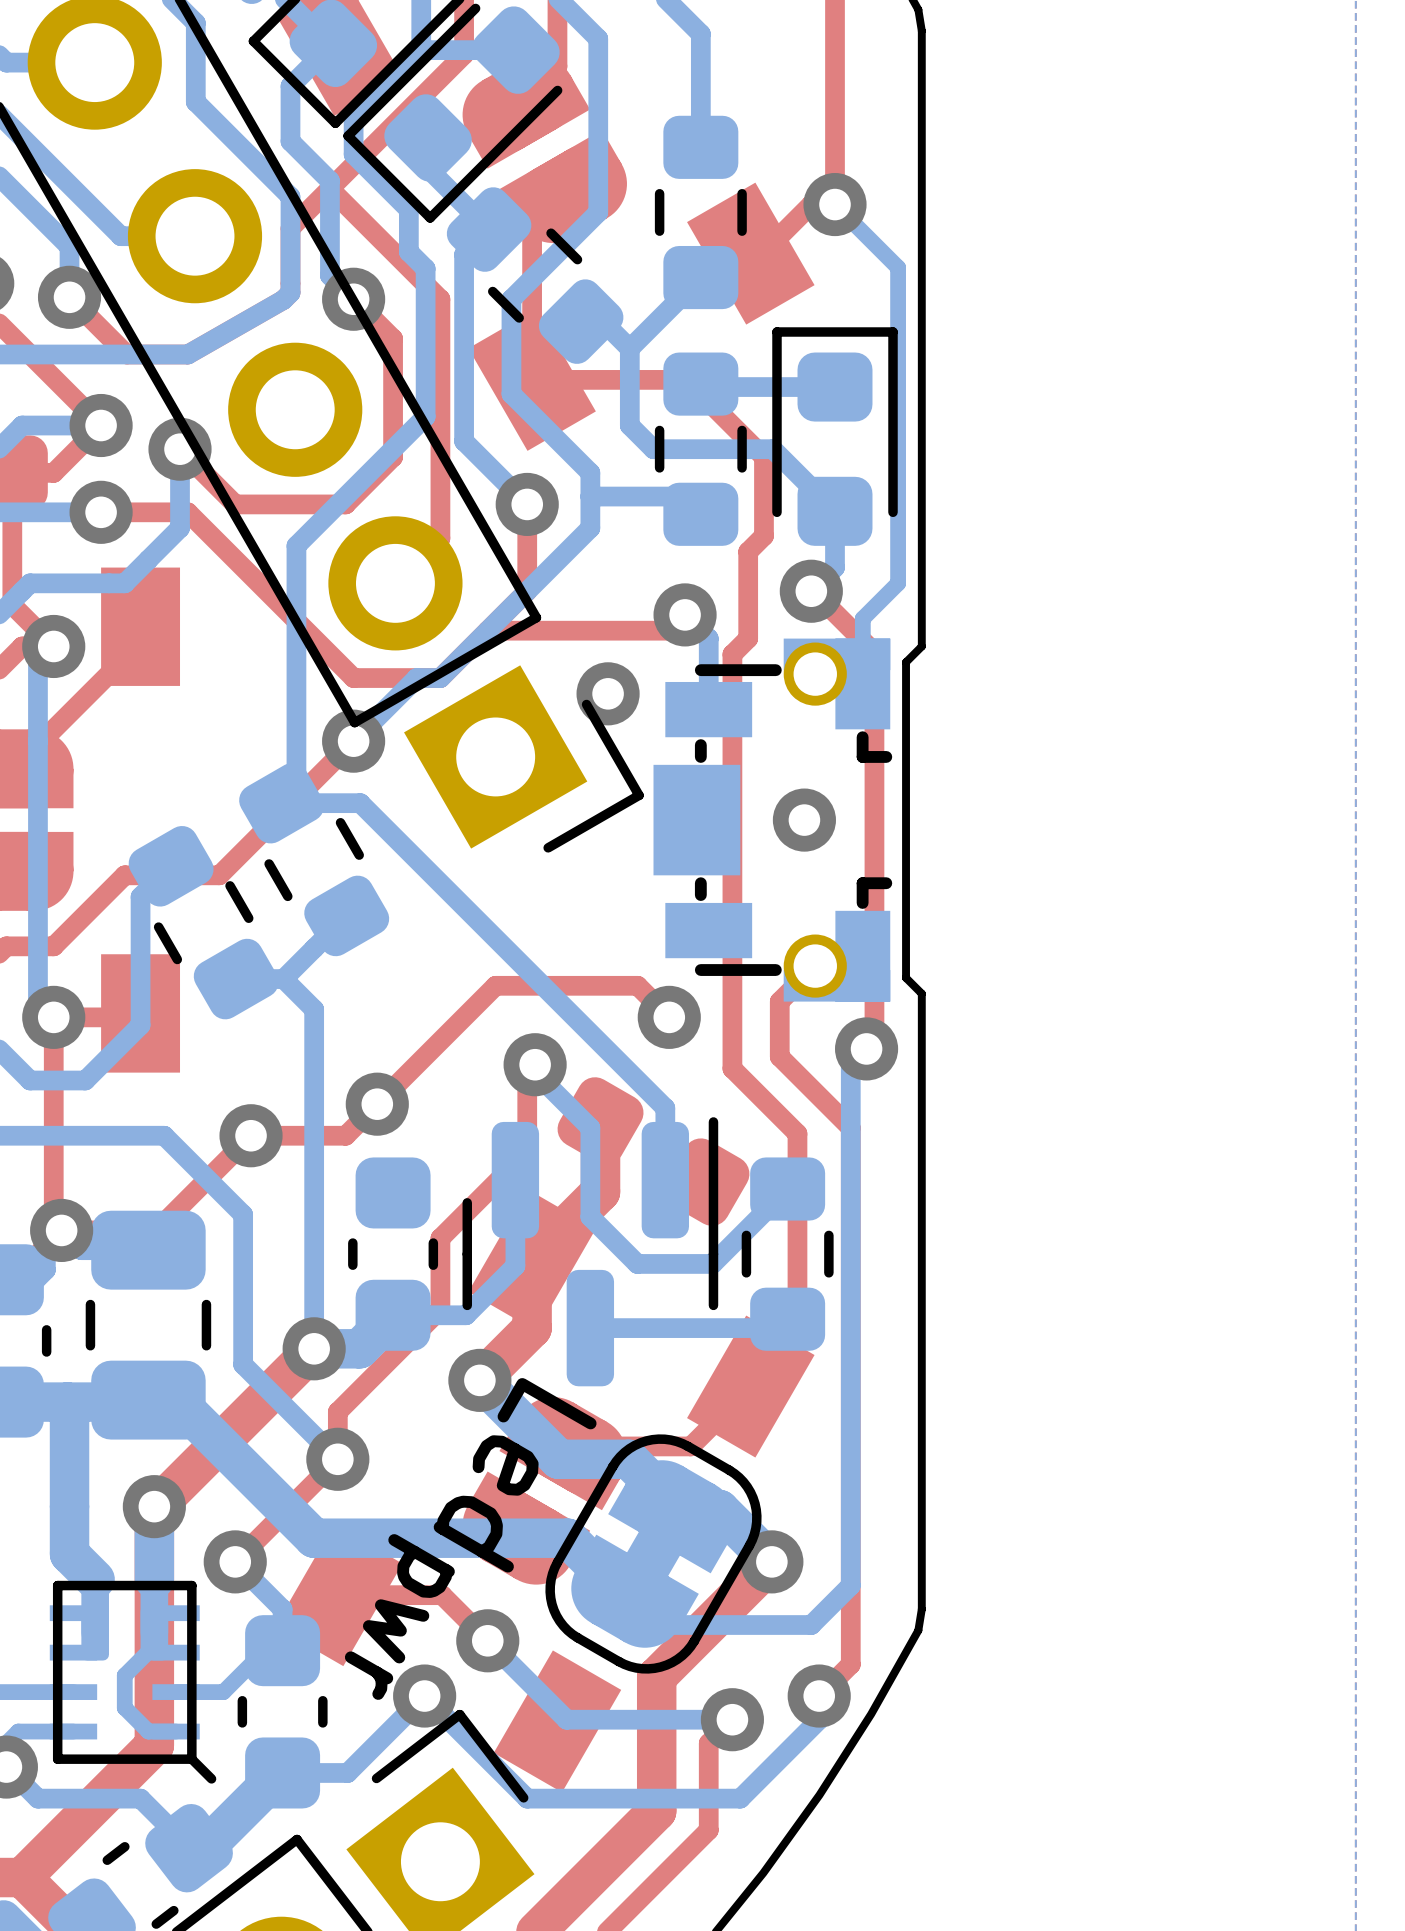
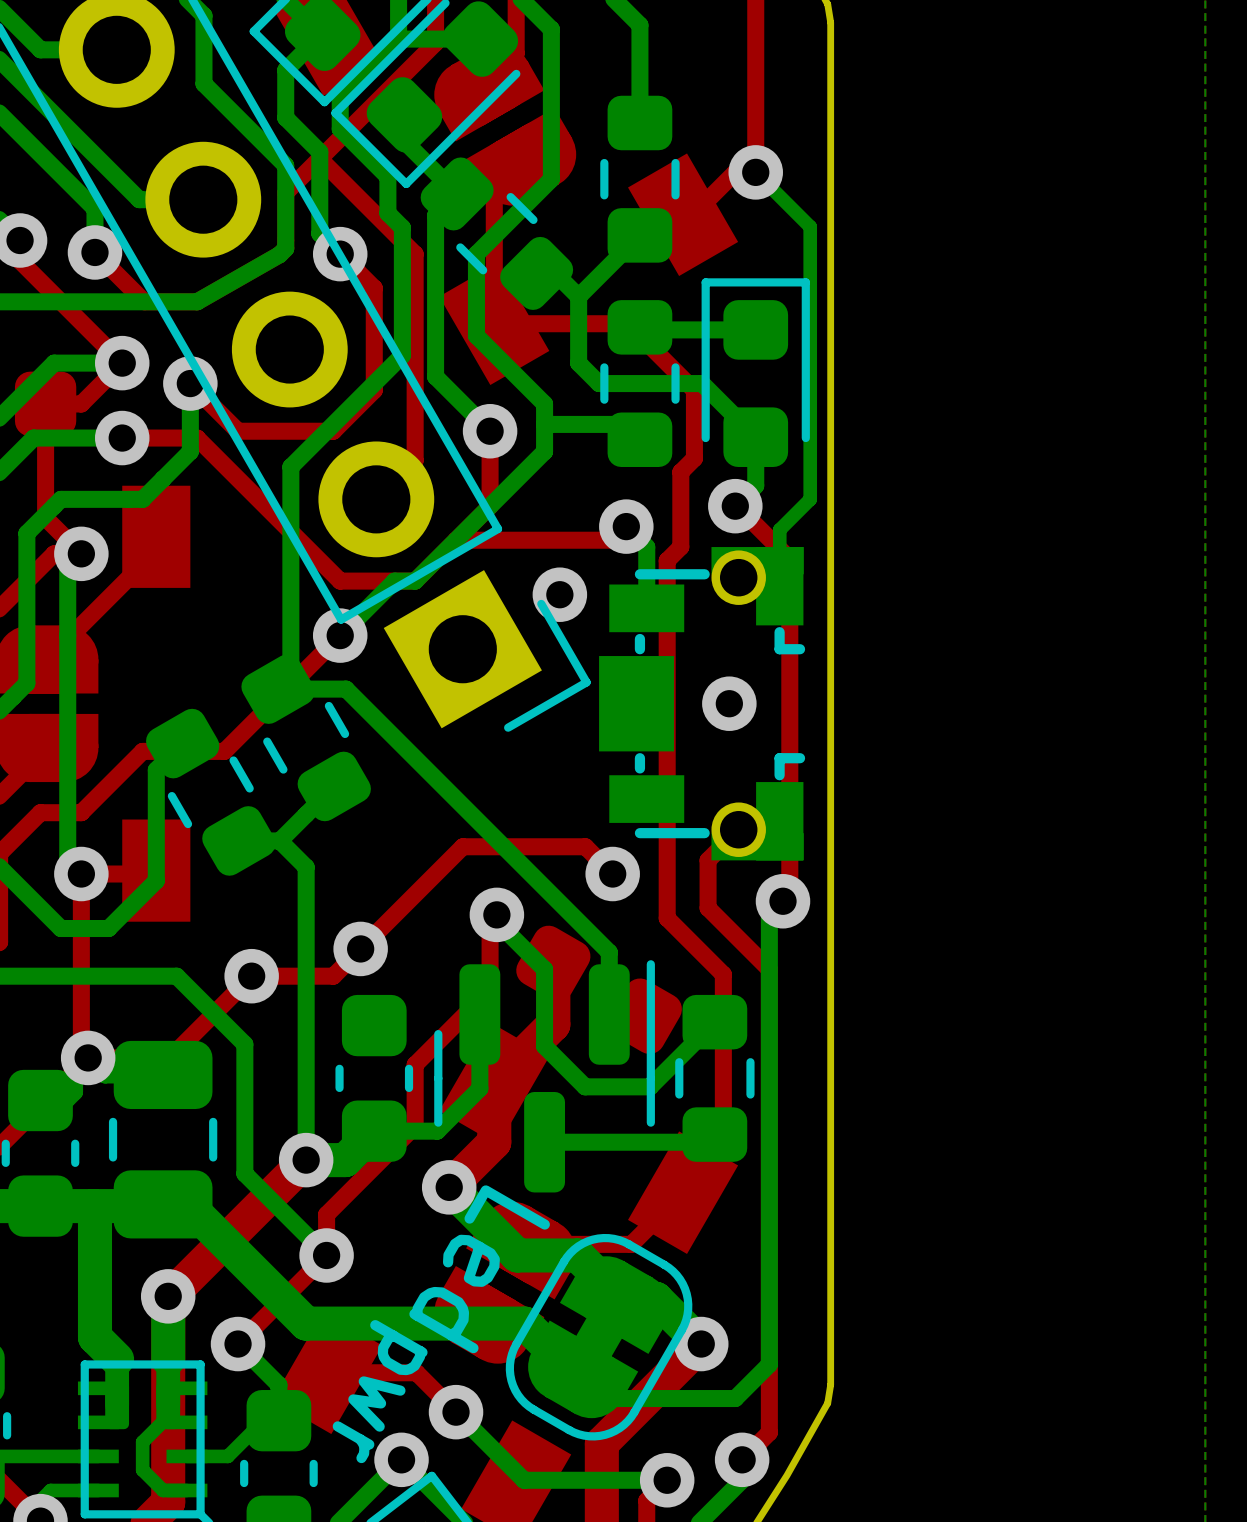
board edge: (921, 646) (906, 662) (906, 977) (921, 993) -> (830, 553) (830, 853)

